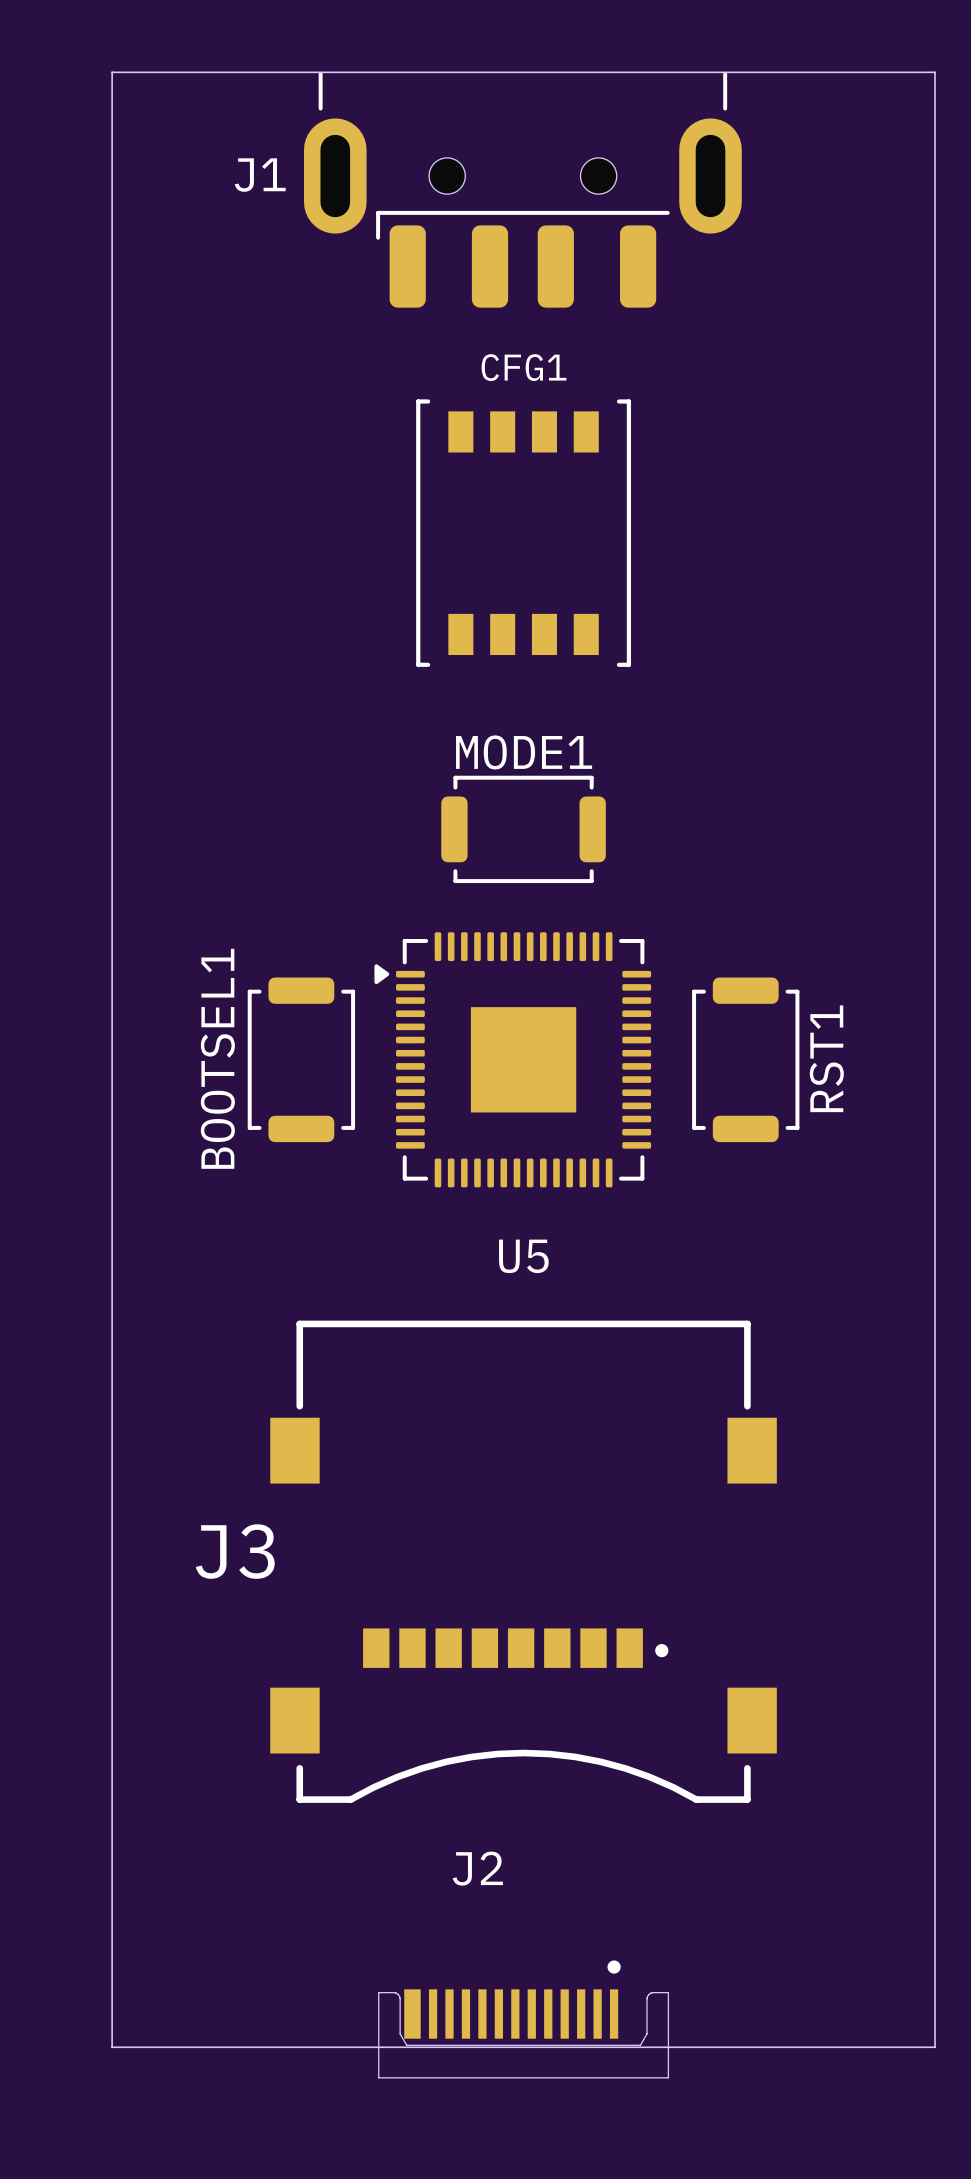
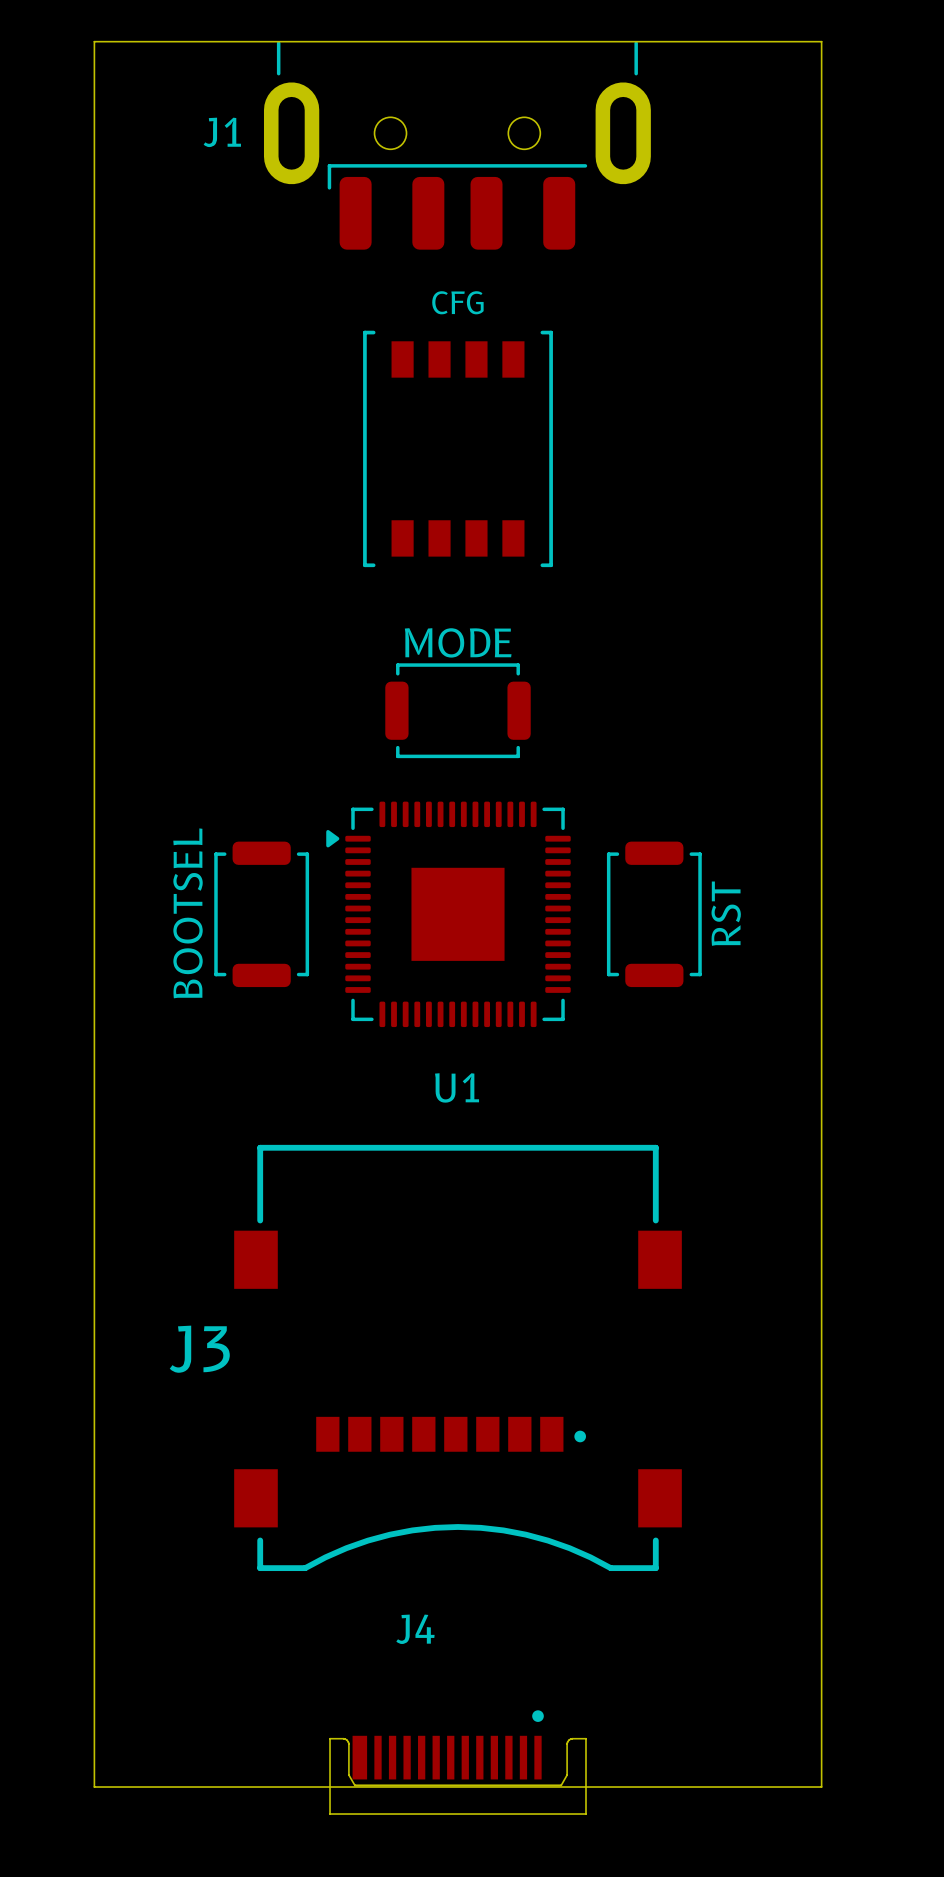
CFG1 name: CFG1 (523, 367) -> CFG (457, 302)
MODE1 name: MODE1 (524, 752) -> MODE (458, 642)
BOOTSEL1 name: BOOTSEL1 (217, 1058) -> BOOTSEL (188, 913)
RST1 name: RST1 (826, 1058) -> RST (726, 913)
U5 name: U5 (523, 1256) -> U1 (457, 1087)
J2 name: J2 (477, 1868) -> J4 (415, 1629)

